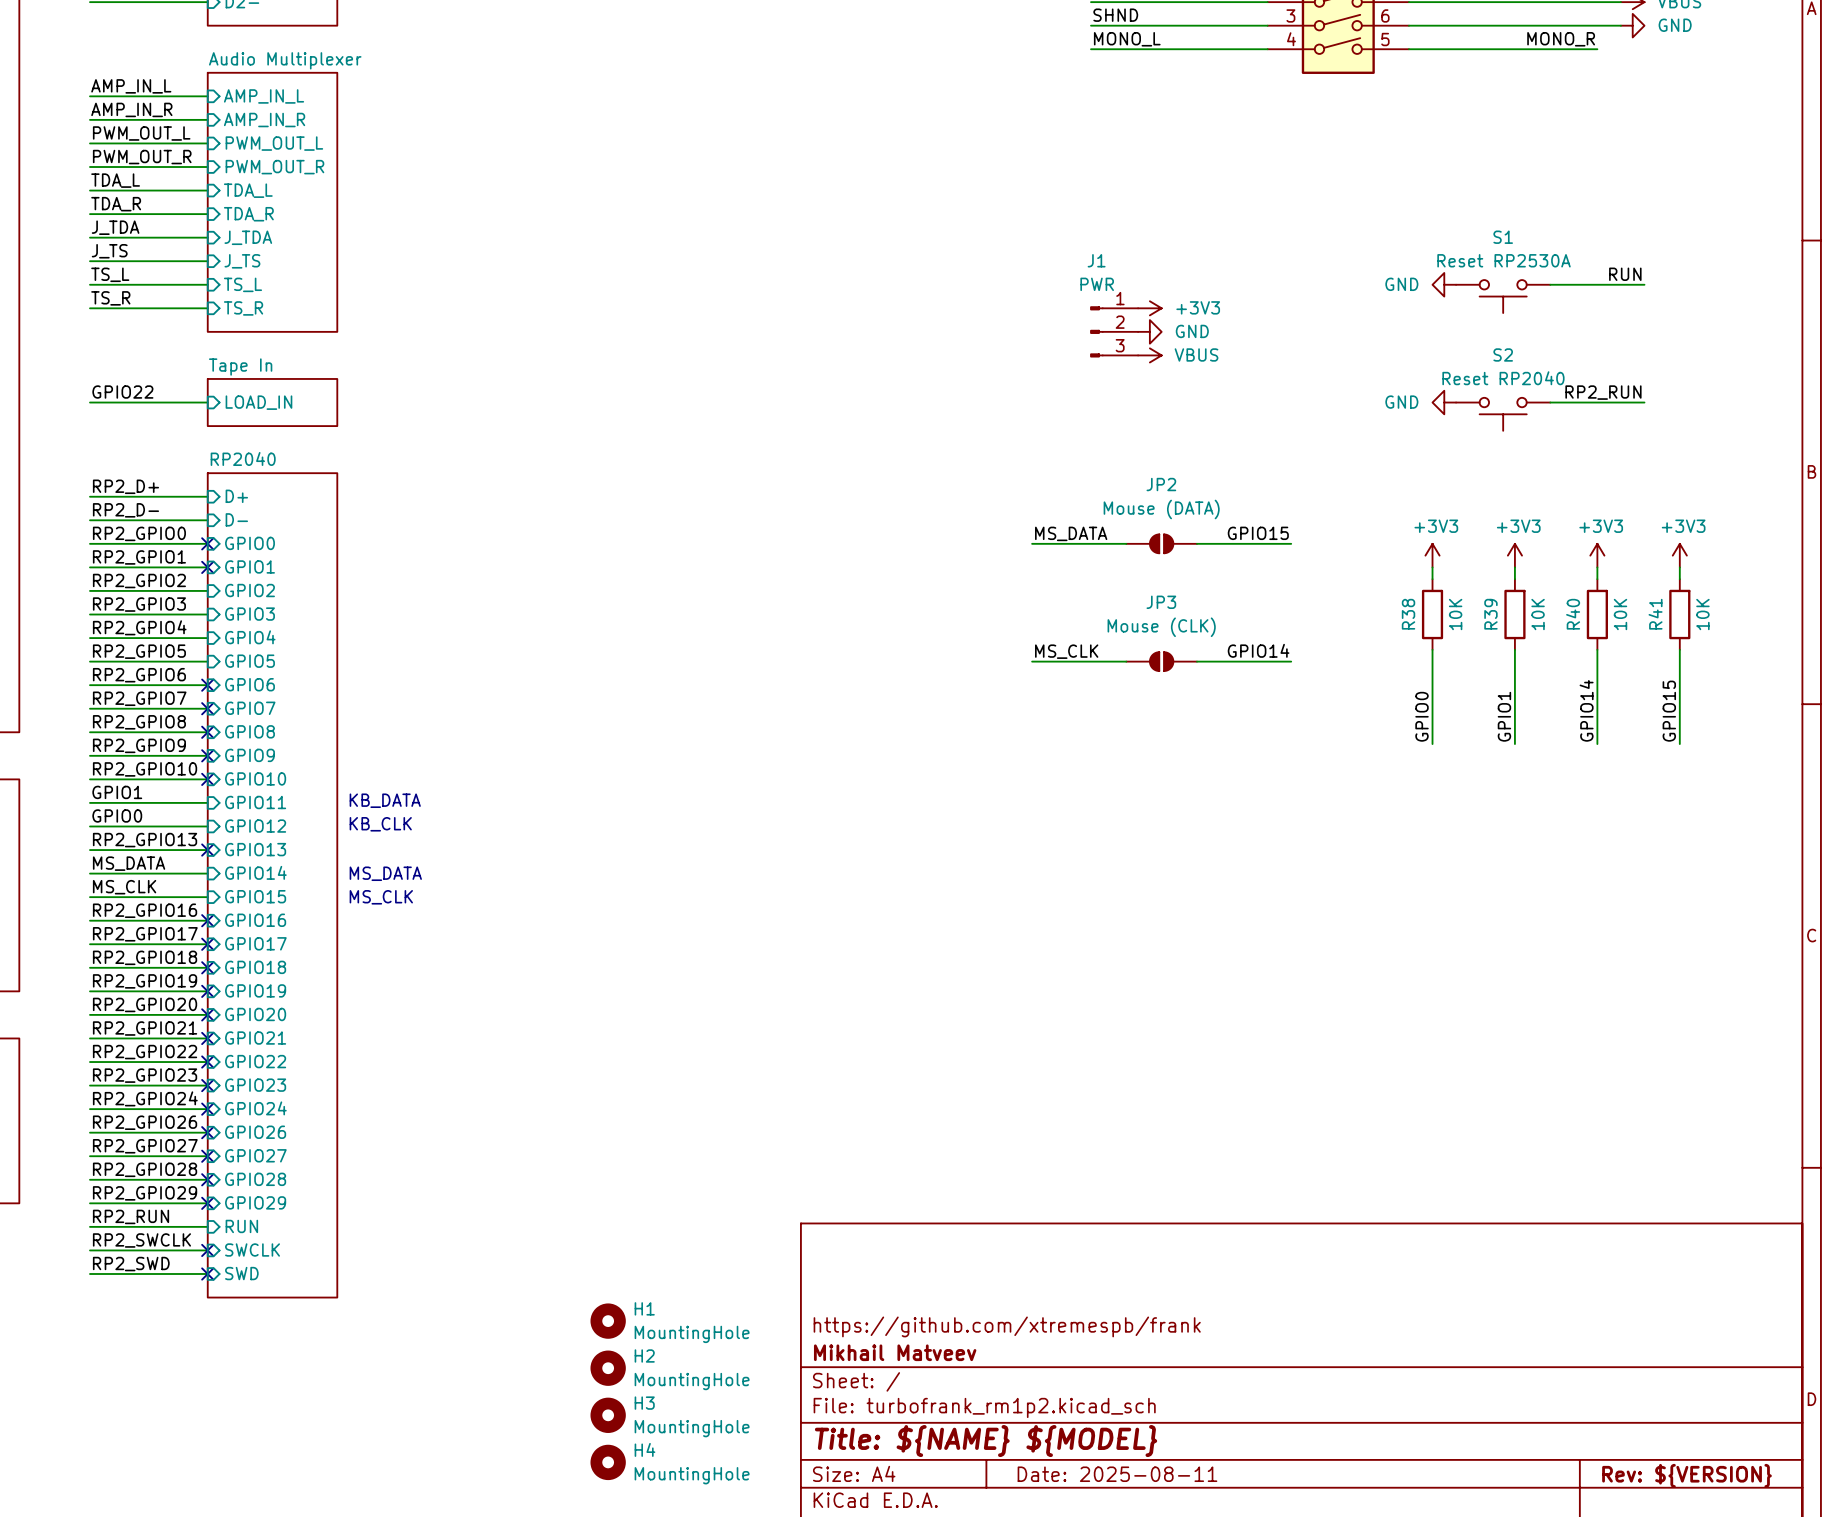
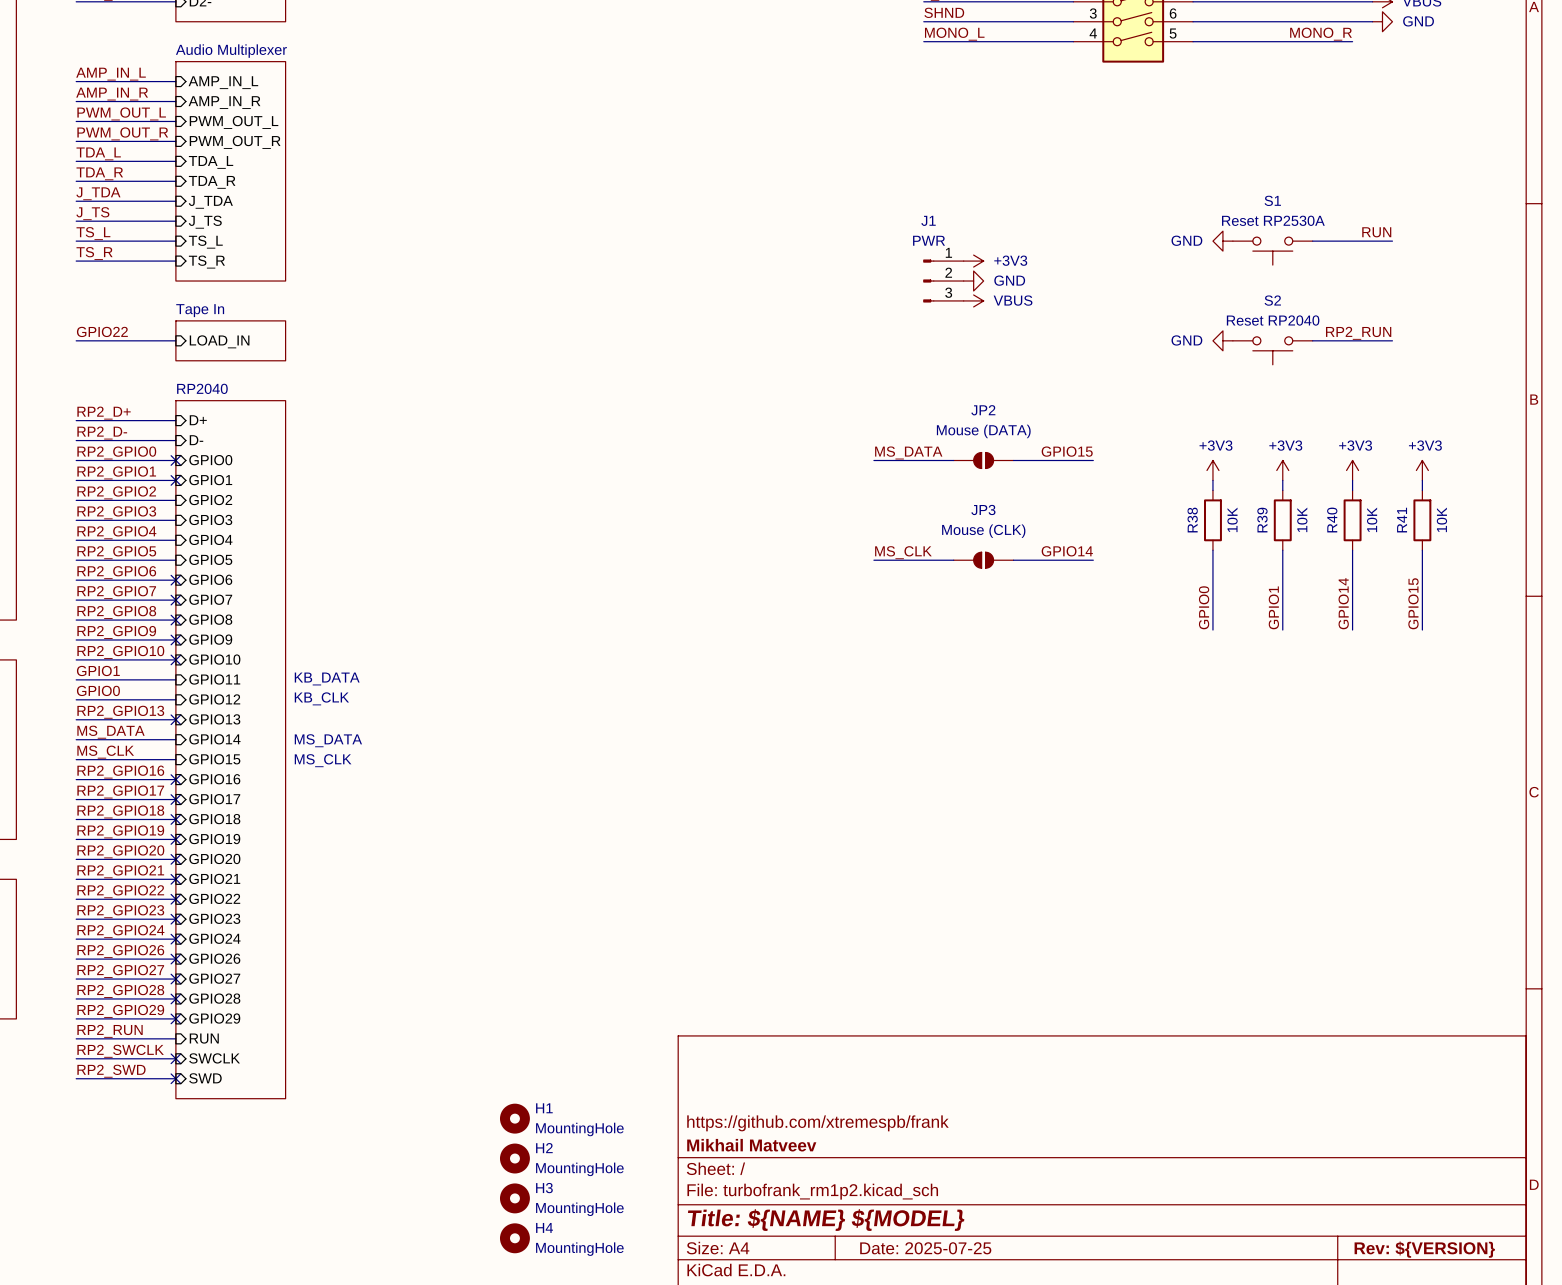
title block: Date: 2025-08-11 (1117, 1474) -> Date: 2025-07-25 (925, 1248)

